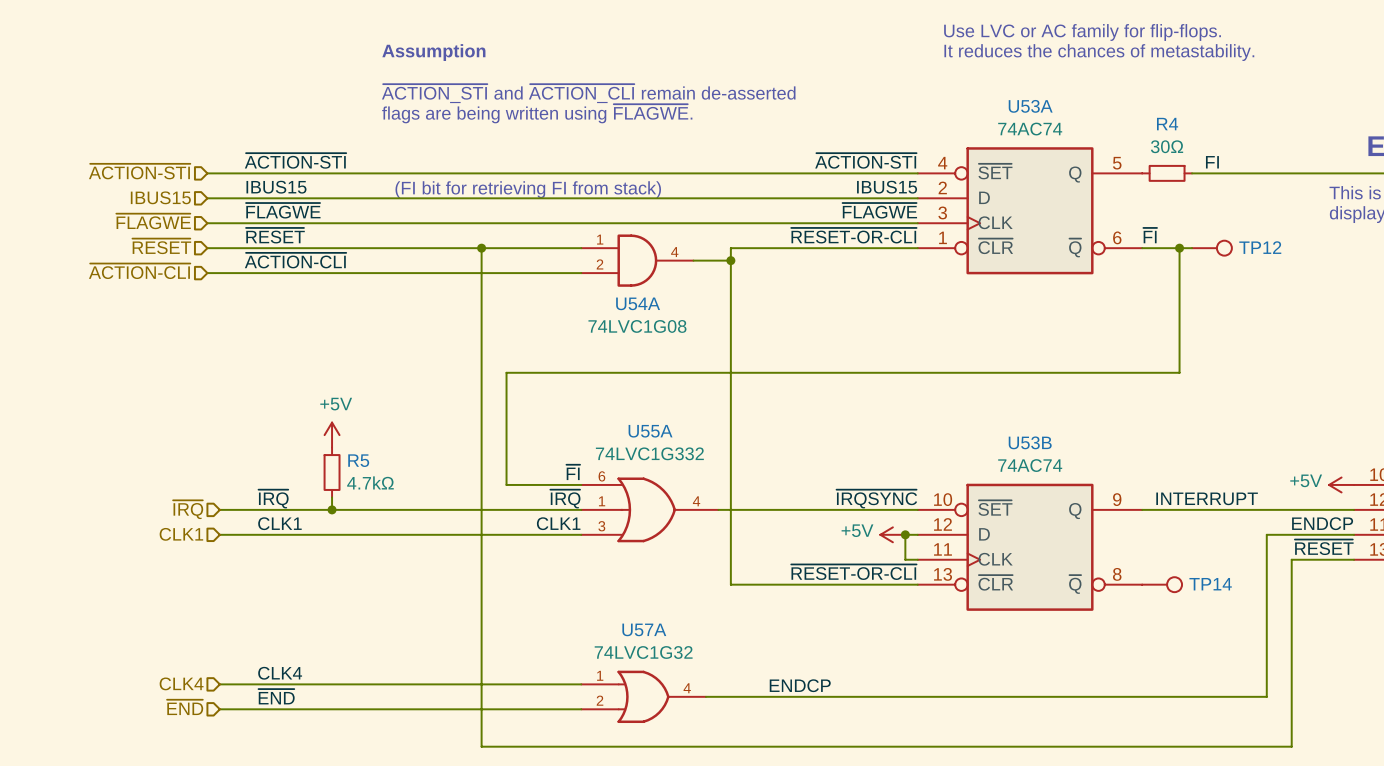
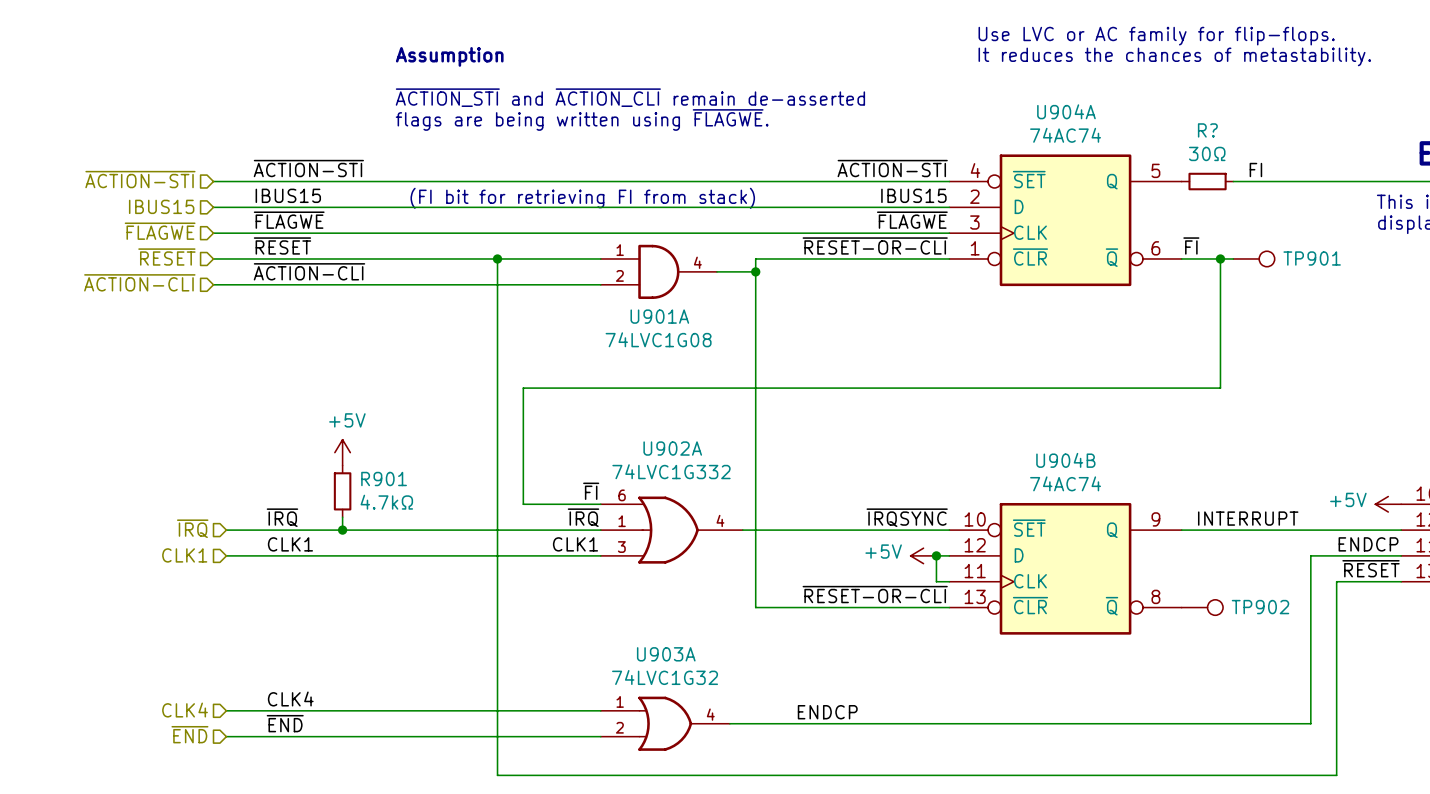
U53A name: U53A (1030, 106) -> U904A (1066, 111)
R4 name: R4 (1167, 124) -> R? (1207, 130)
TP12 name: TP12 (1260, 247) -> TP901 (1312, 258)
U54A name: U54A (638, 303) -> U901A (659, 316)
U55A name: U55A (650, 431) -> U902A (672, 448)
U53B name: U53B (1030, 442) -> U904B (1065, 460)
R5 name: R5 (358, 460) -> R901 (384, 479)
TP14 name: TP14 (1210, 584) -> TP902 (1260, 607)
U57A name: U57A (644, 629) -> U903A (666, 654)

